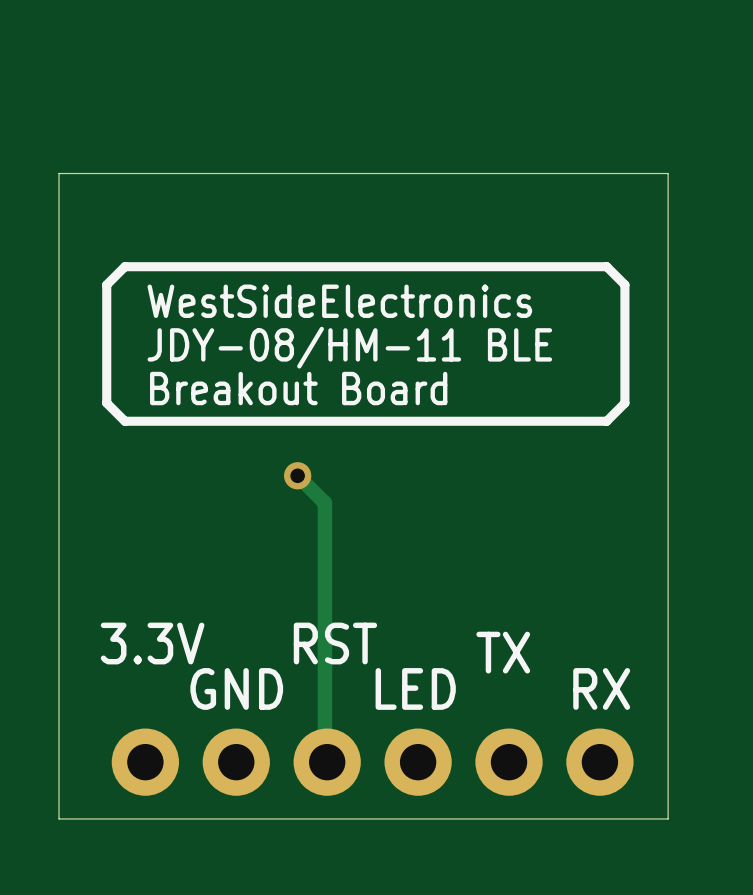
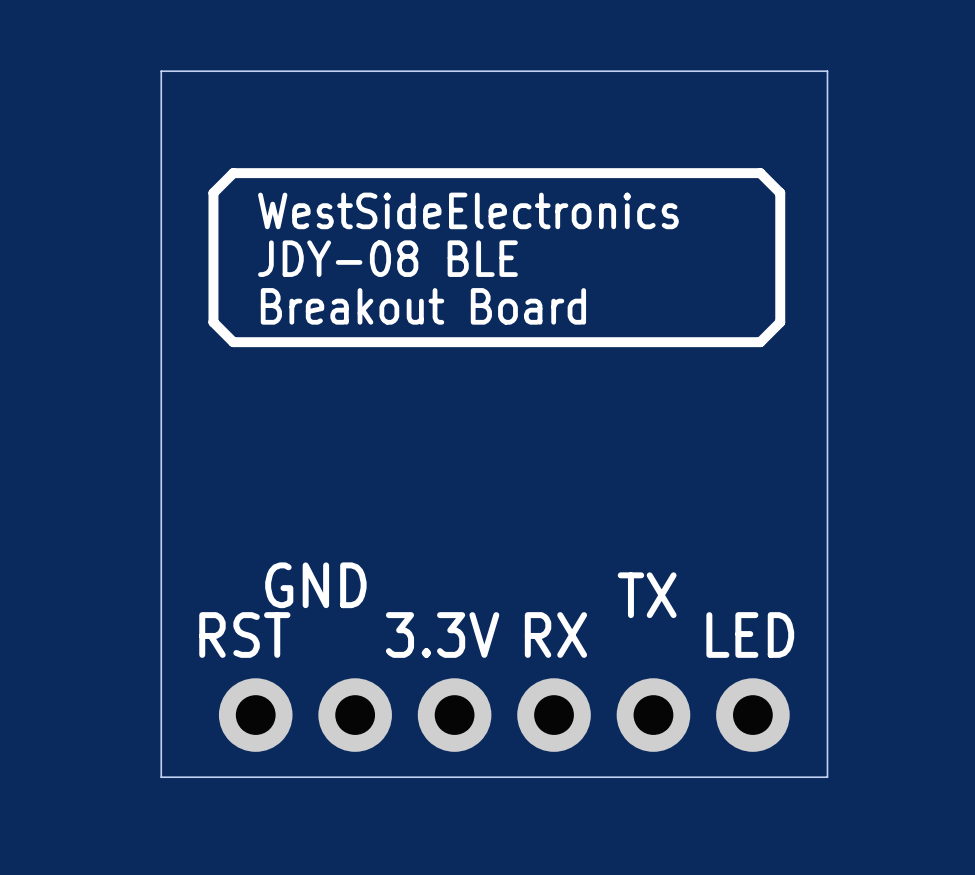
text: JDY-08/HM-11 BLE (349, 347) -> JDY-08 BLE (387, 258)
track: (297, 475) (324, 503) (324, 759) (327, 762) -> none
via: (297, 475) -> none
text position: 3.3V (152, 643) -> 3.3V (442, 634)
text position: RST (335, 643) -> RST (244, 634)
text position: GND (236, 688) -> GND (315, 585)
text position: LED (415, 688) -> LED (750, 634)
text position: RX (601, 688) -> RX (555, 634)

